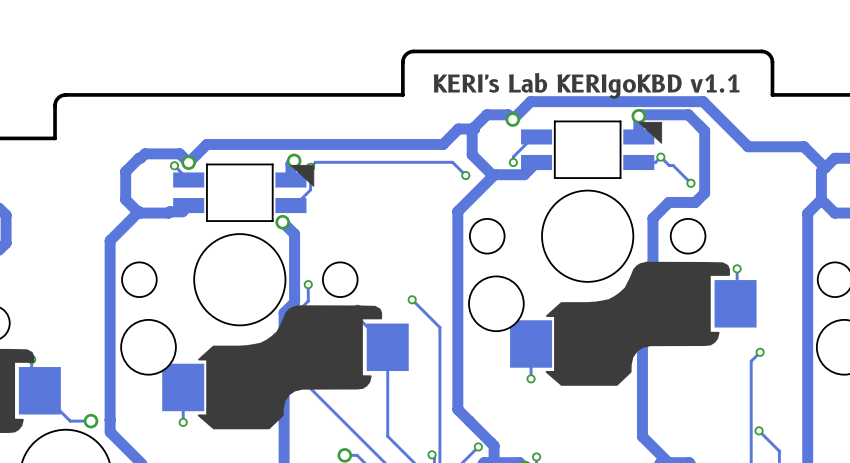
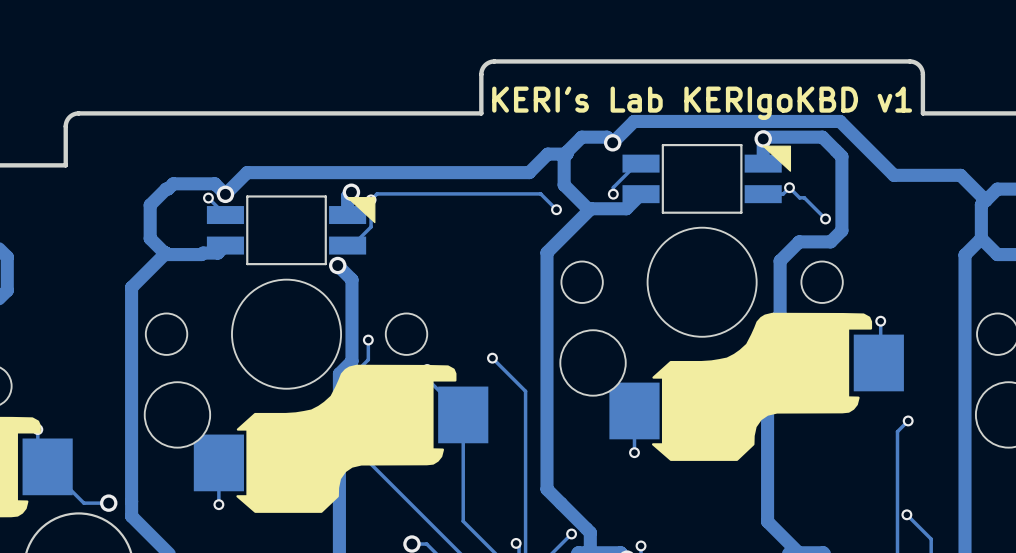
text: KERI's Lab KERIgoKBD v1.1 (586, 85) -> KERI's Lab KERIgoKBD v1 (702, 103)

